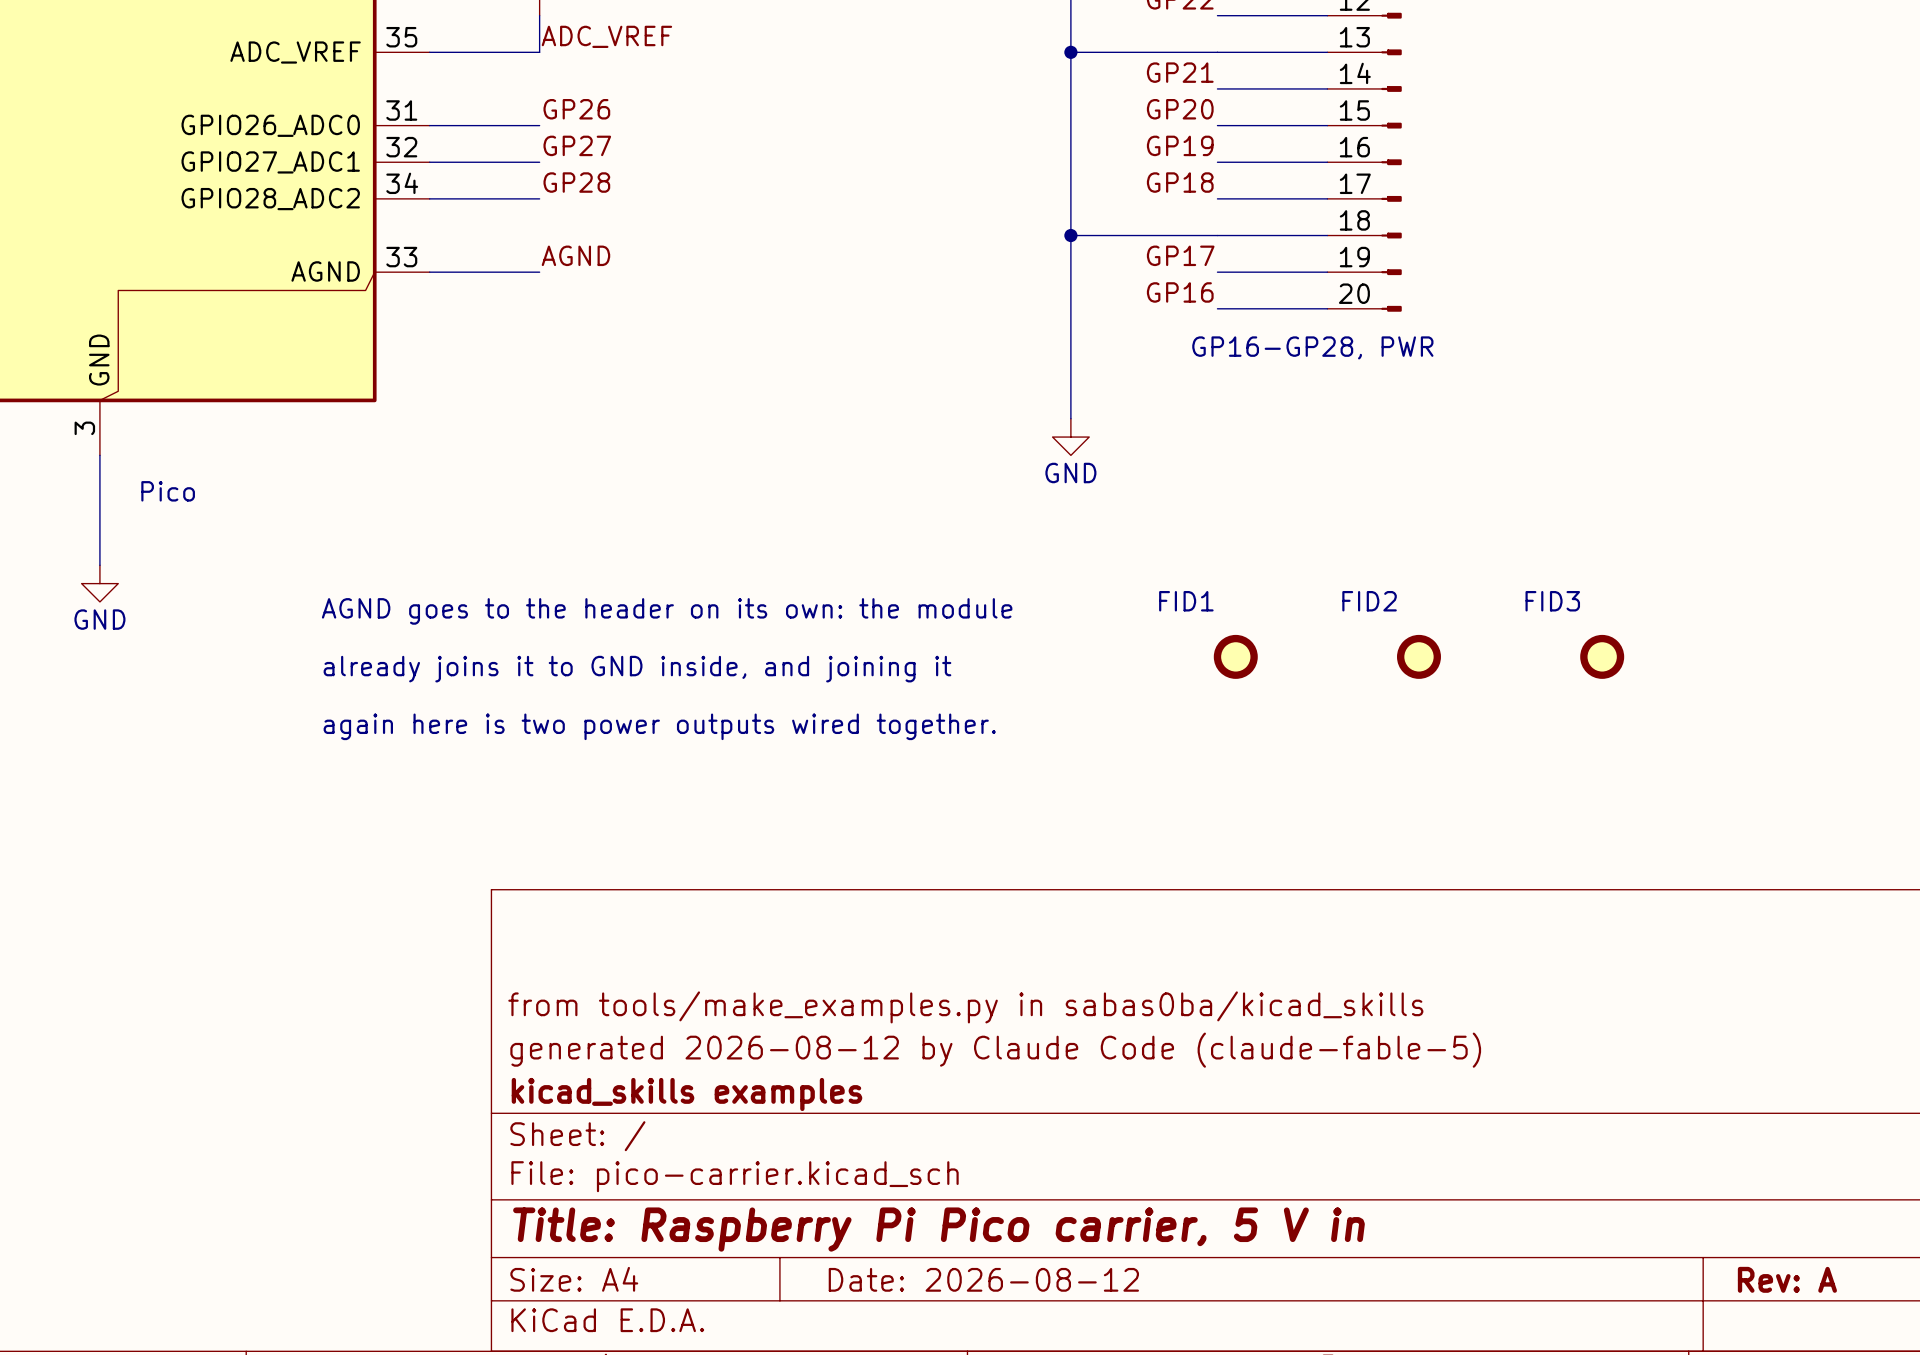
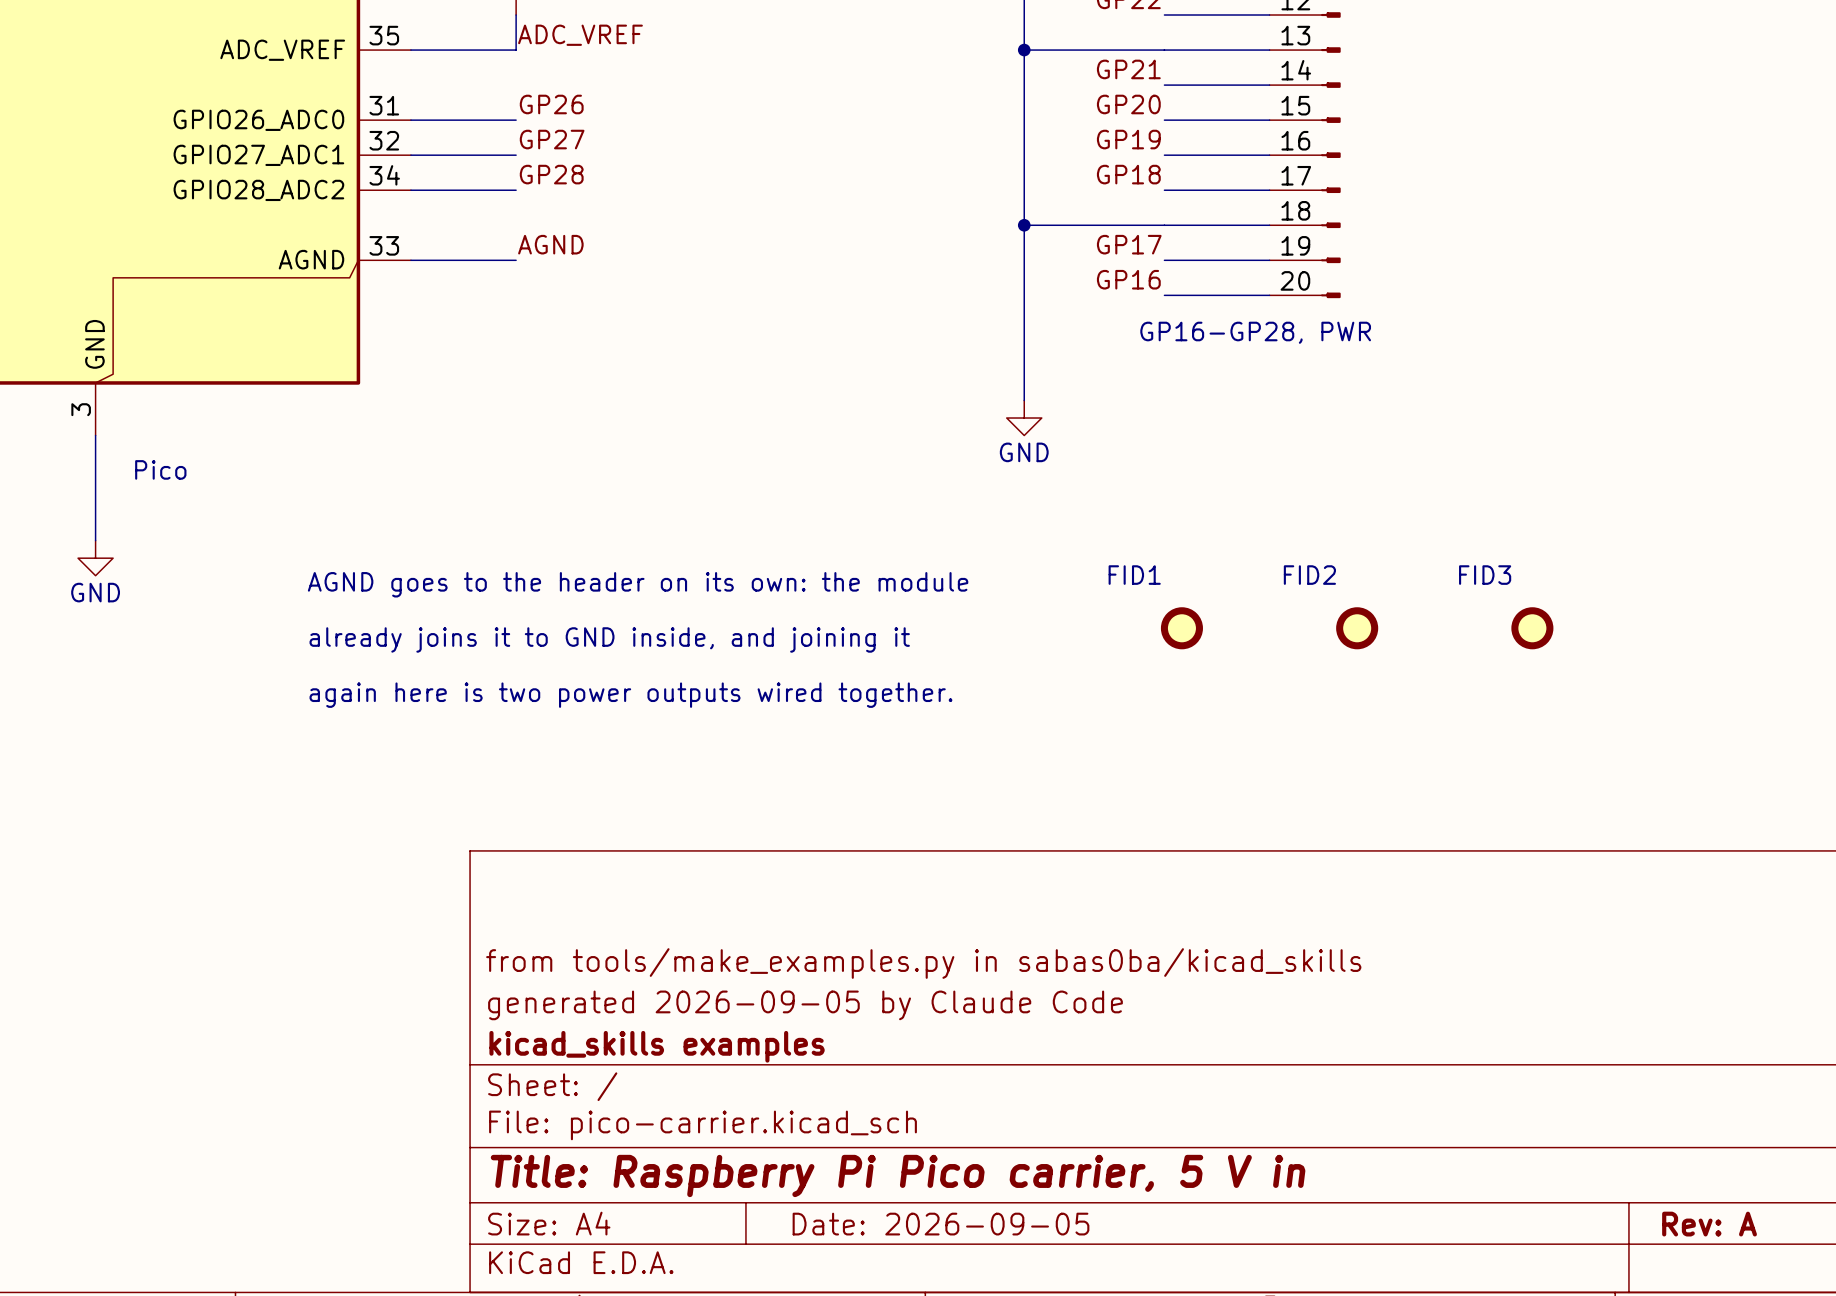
title block: generated 2026-08-12 by Claude Code (claude-fable-5) (995, 1050) -> generated 2026-09-05 by Claude Code (805, 1005)
title block: Date: 2026-08-12 (983, 1279) -> Date: 2026-09-05 (941, 1224)

